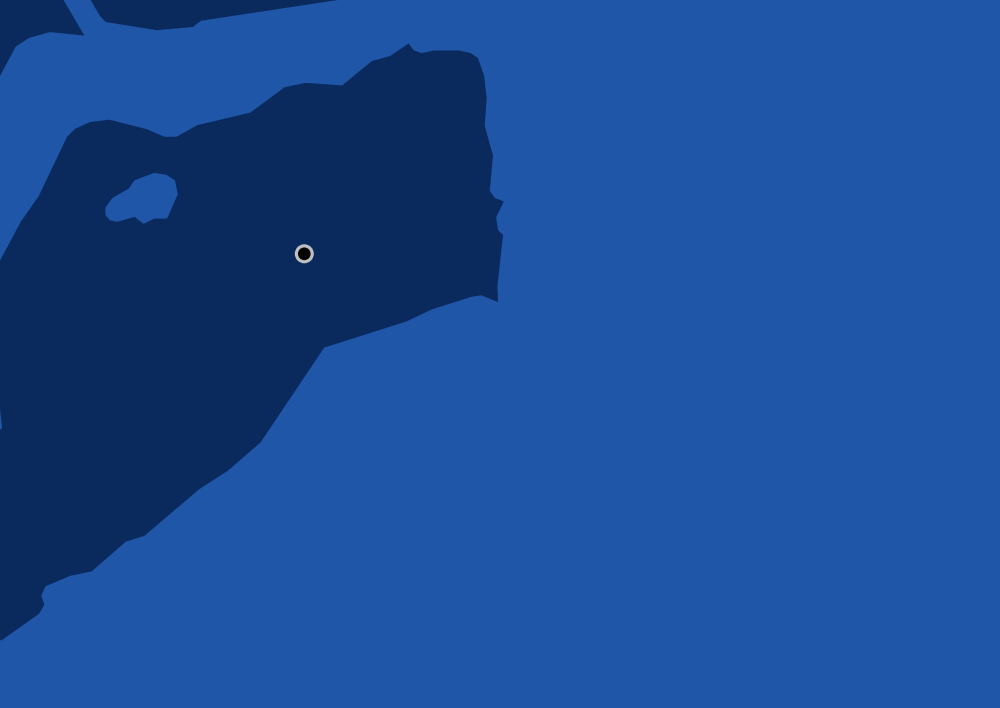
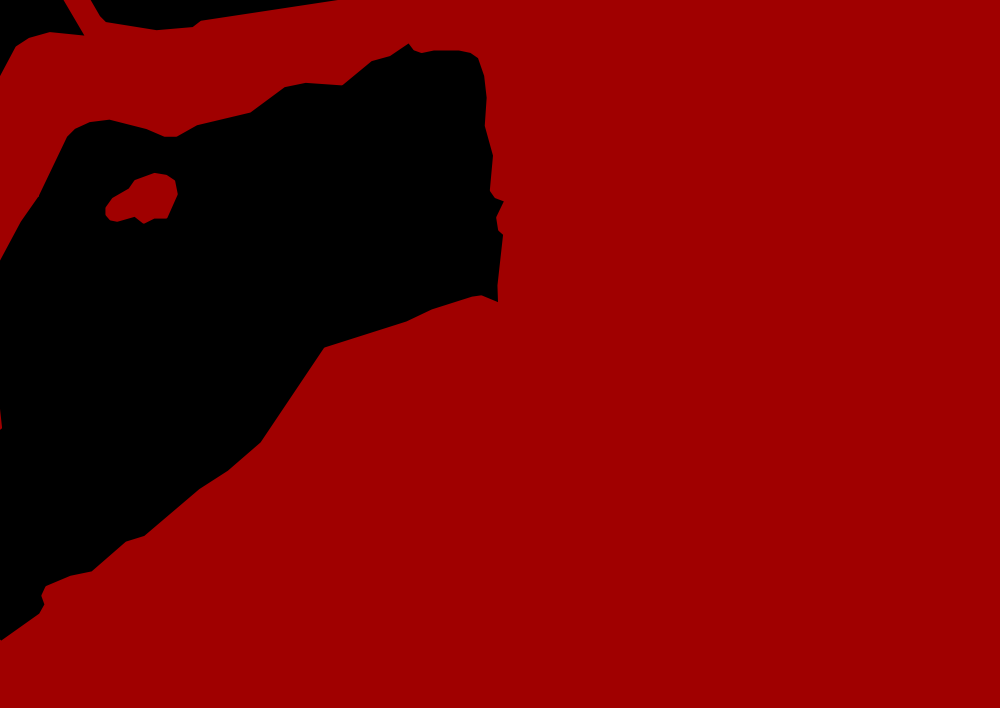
via: (304, 253) -> none

